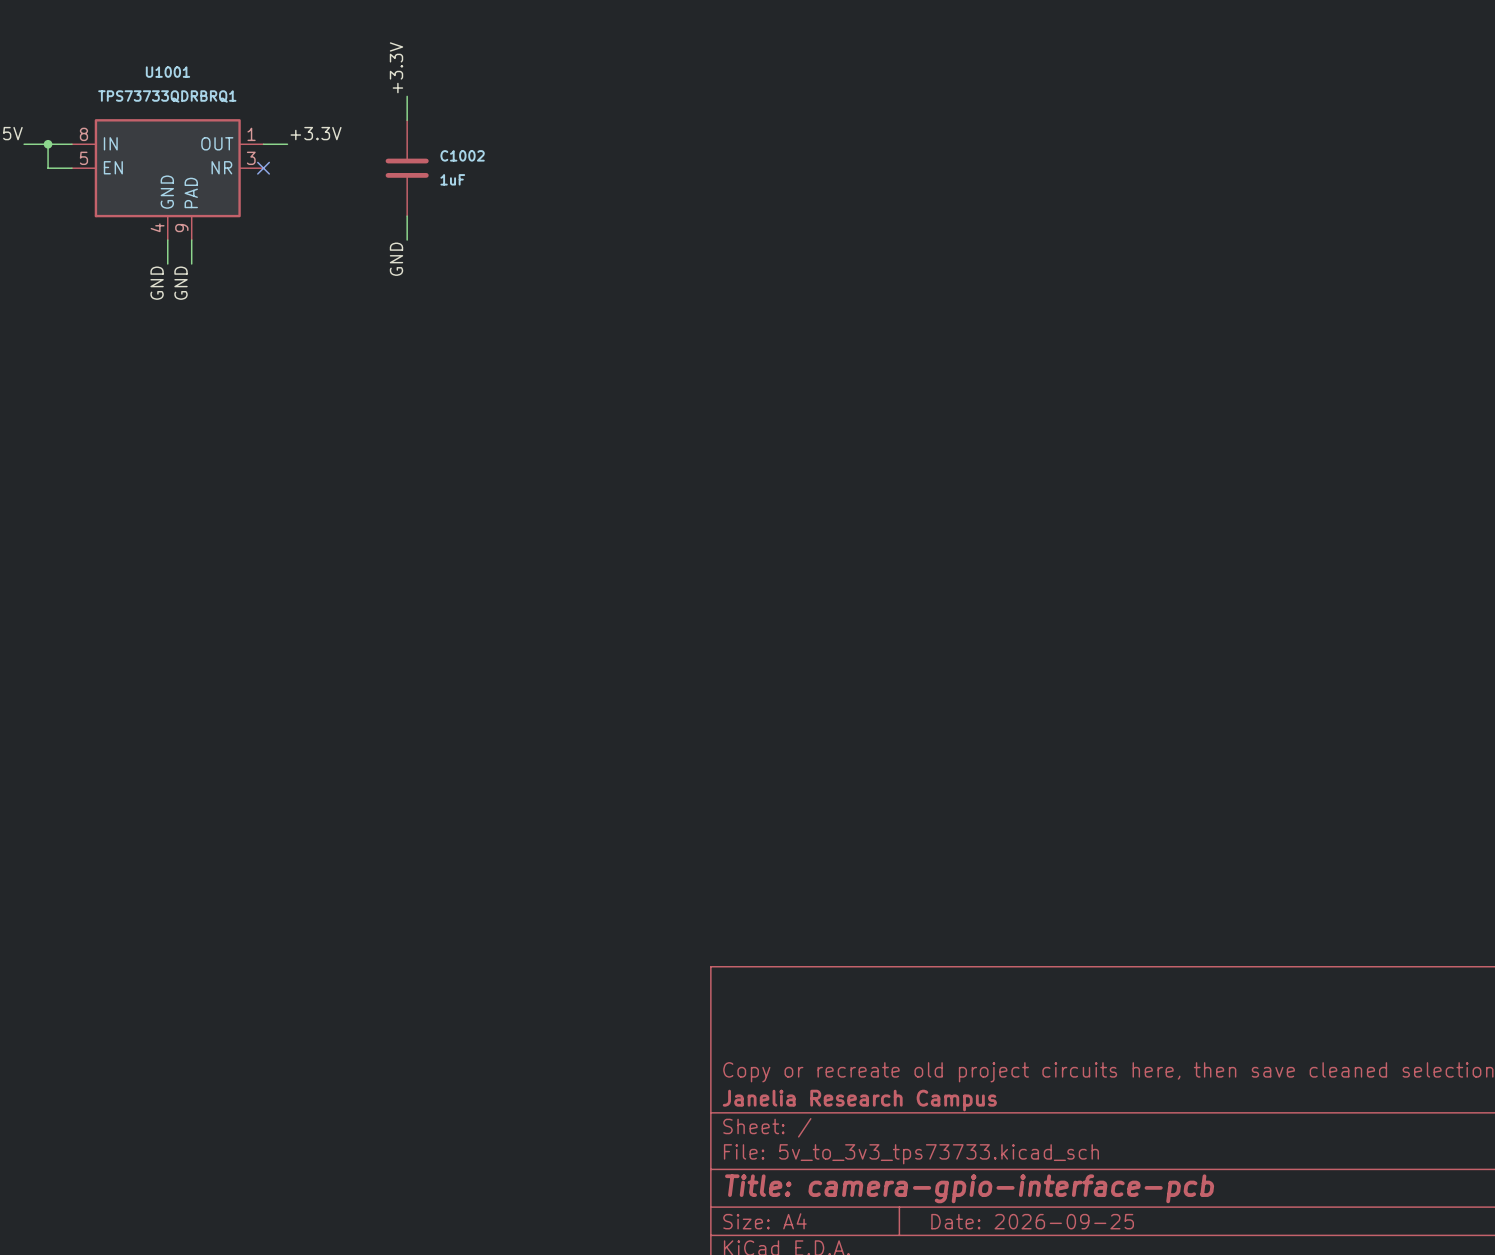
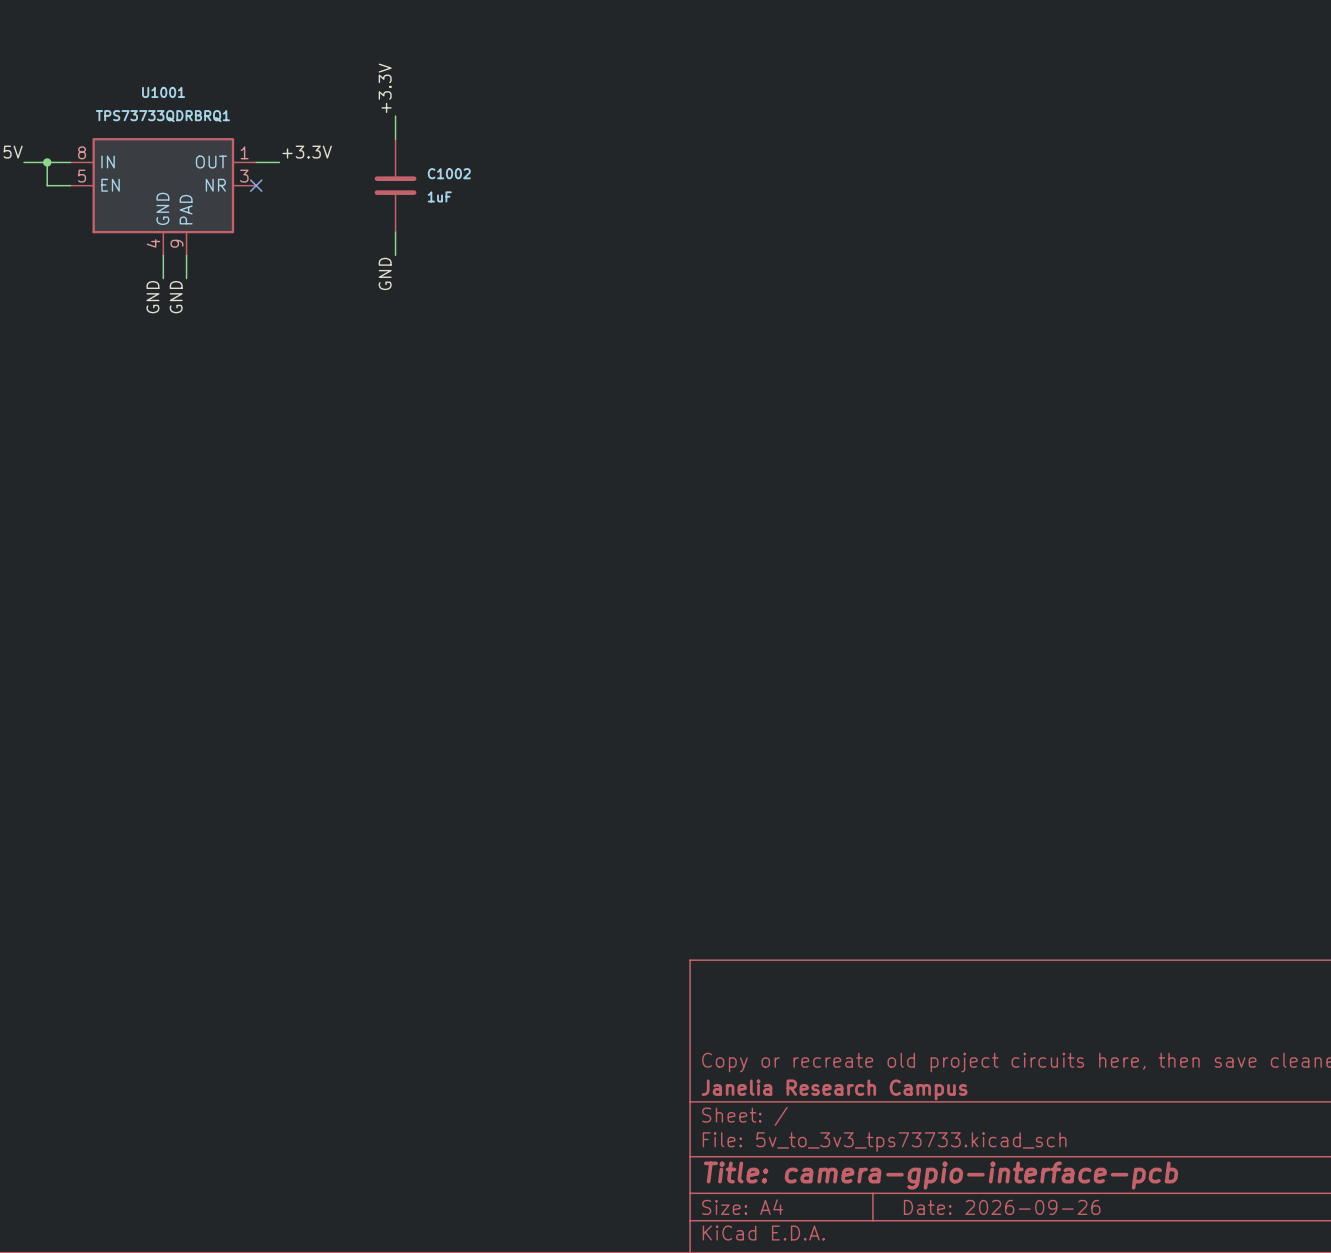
title block: Date: 2026-09-25 (1032, 1221) -> Date: 2026-09-26 (1002, 1207)

